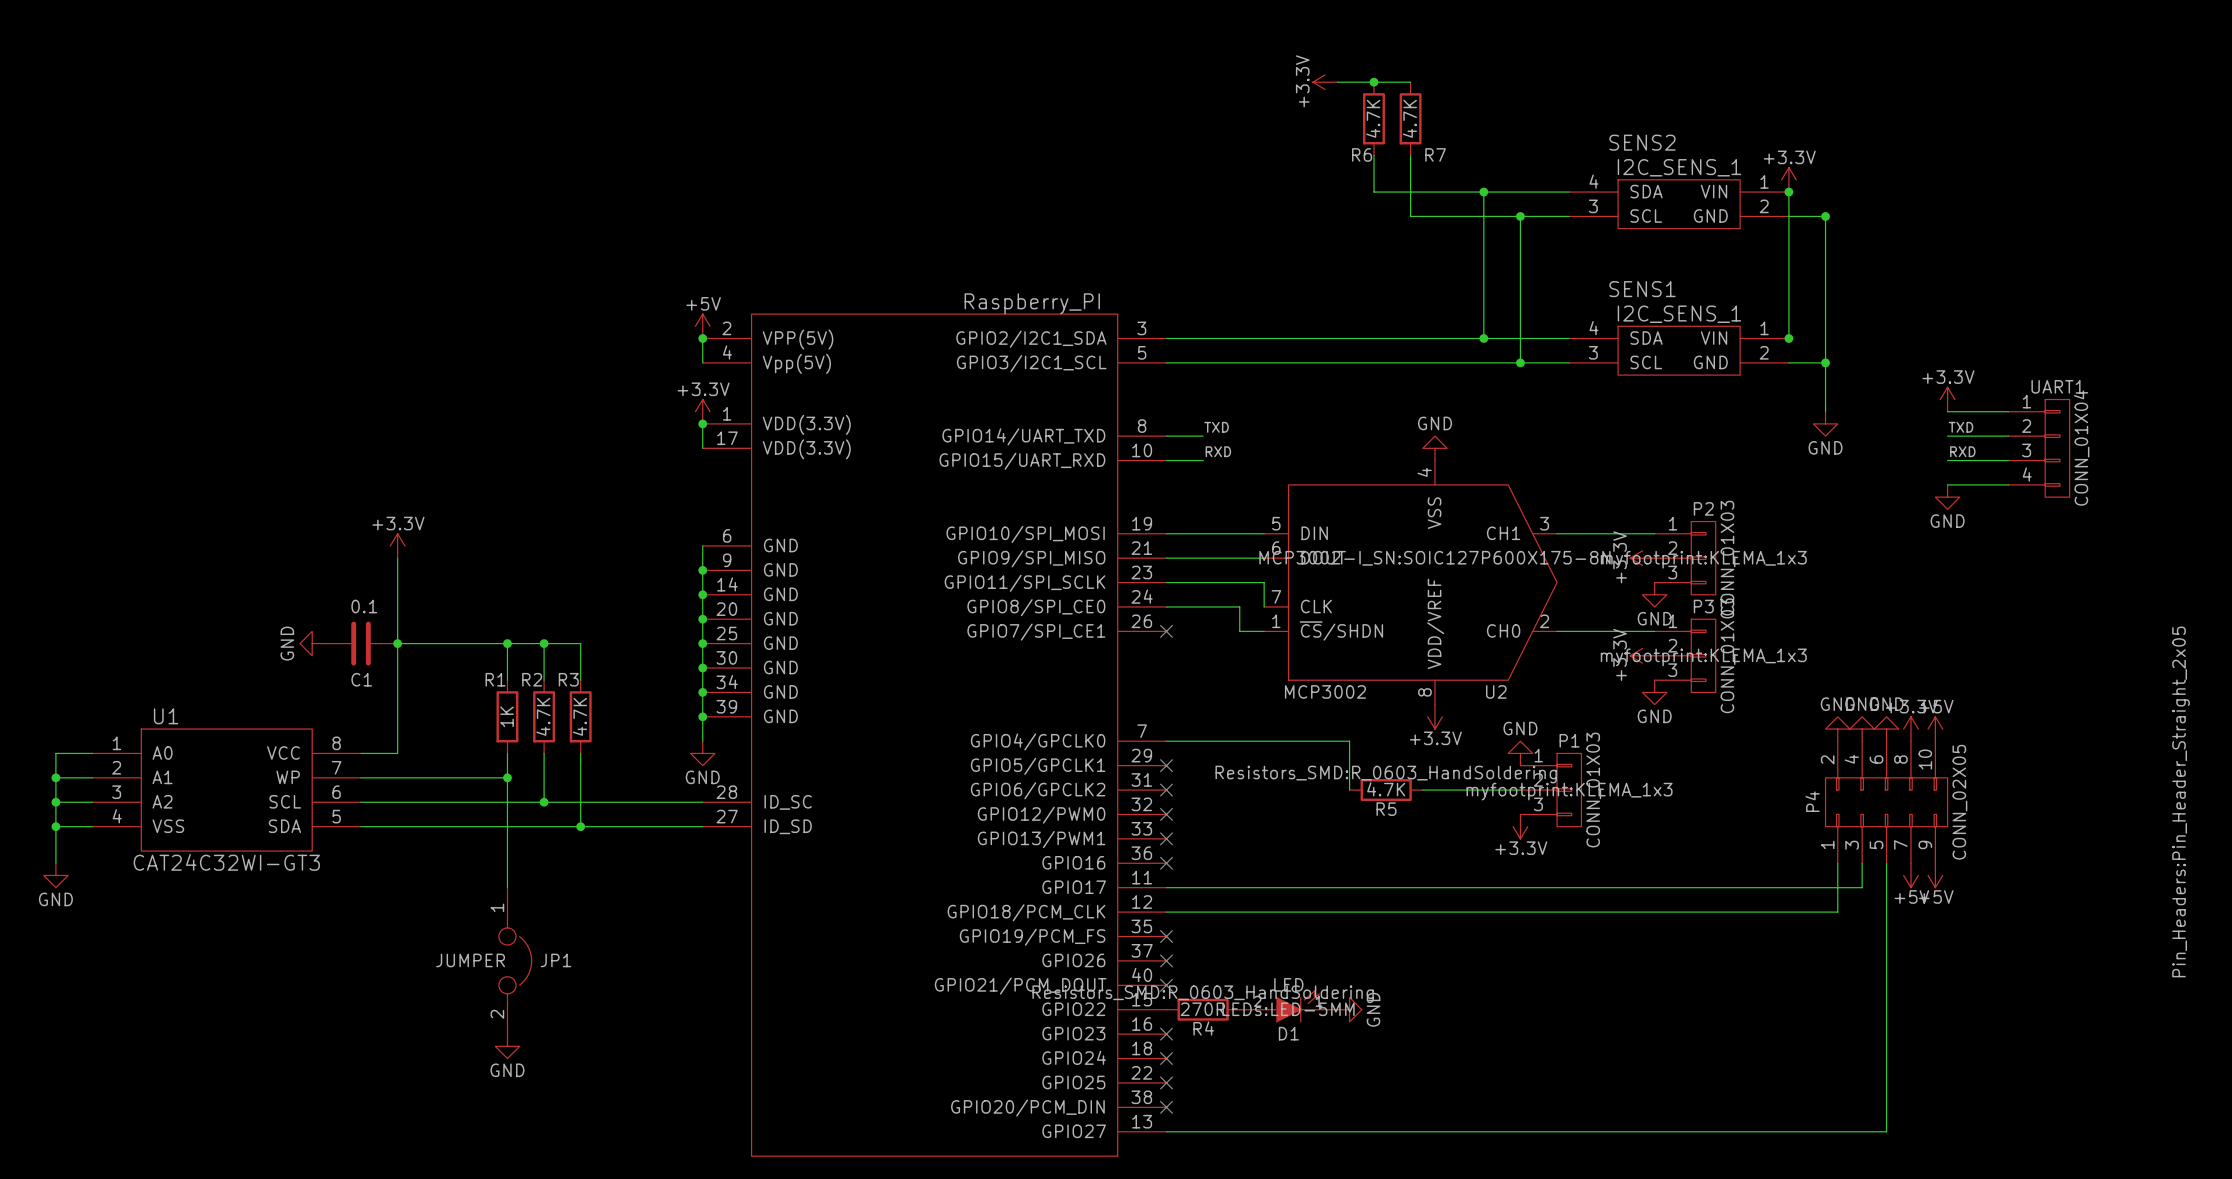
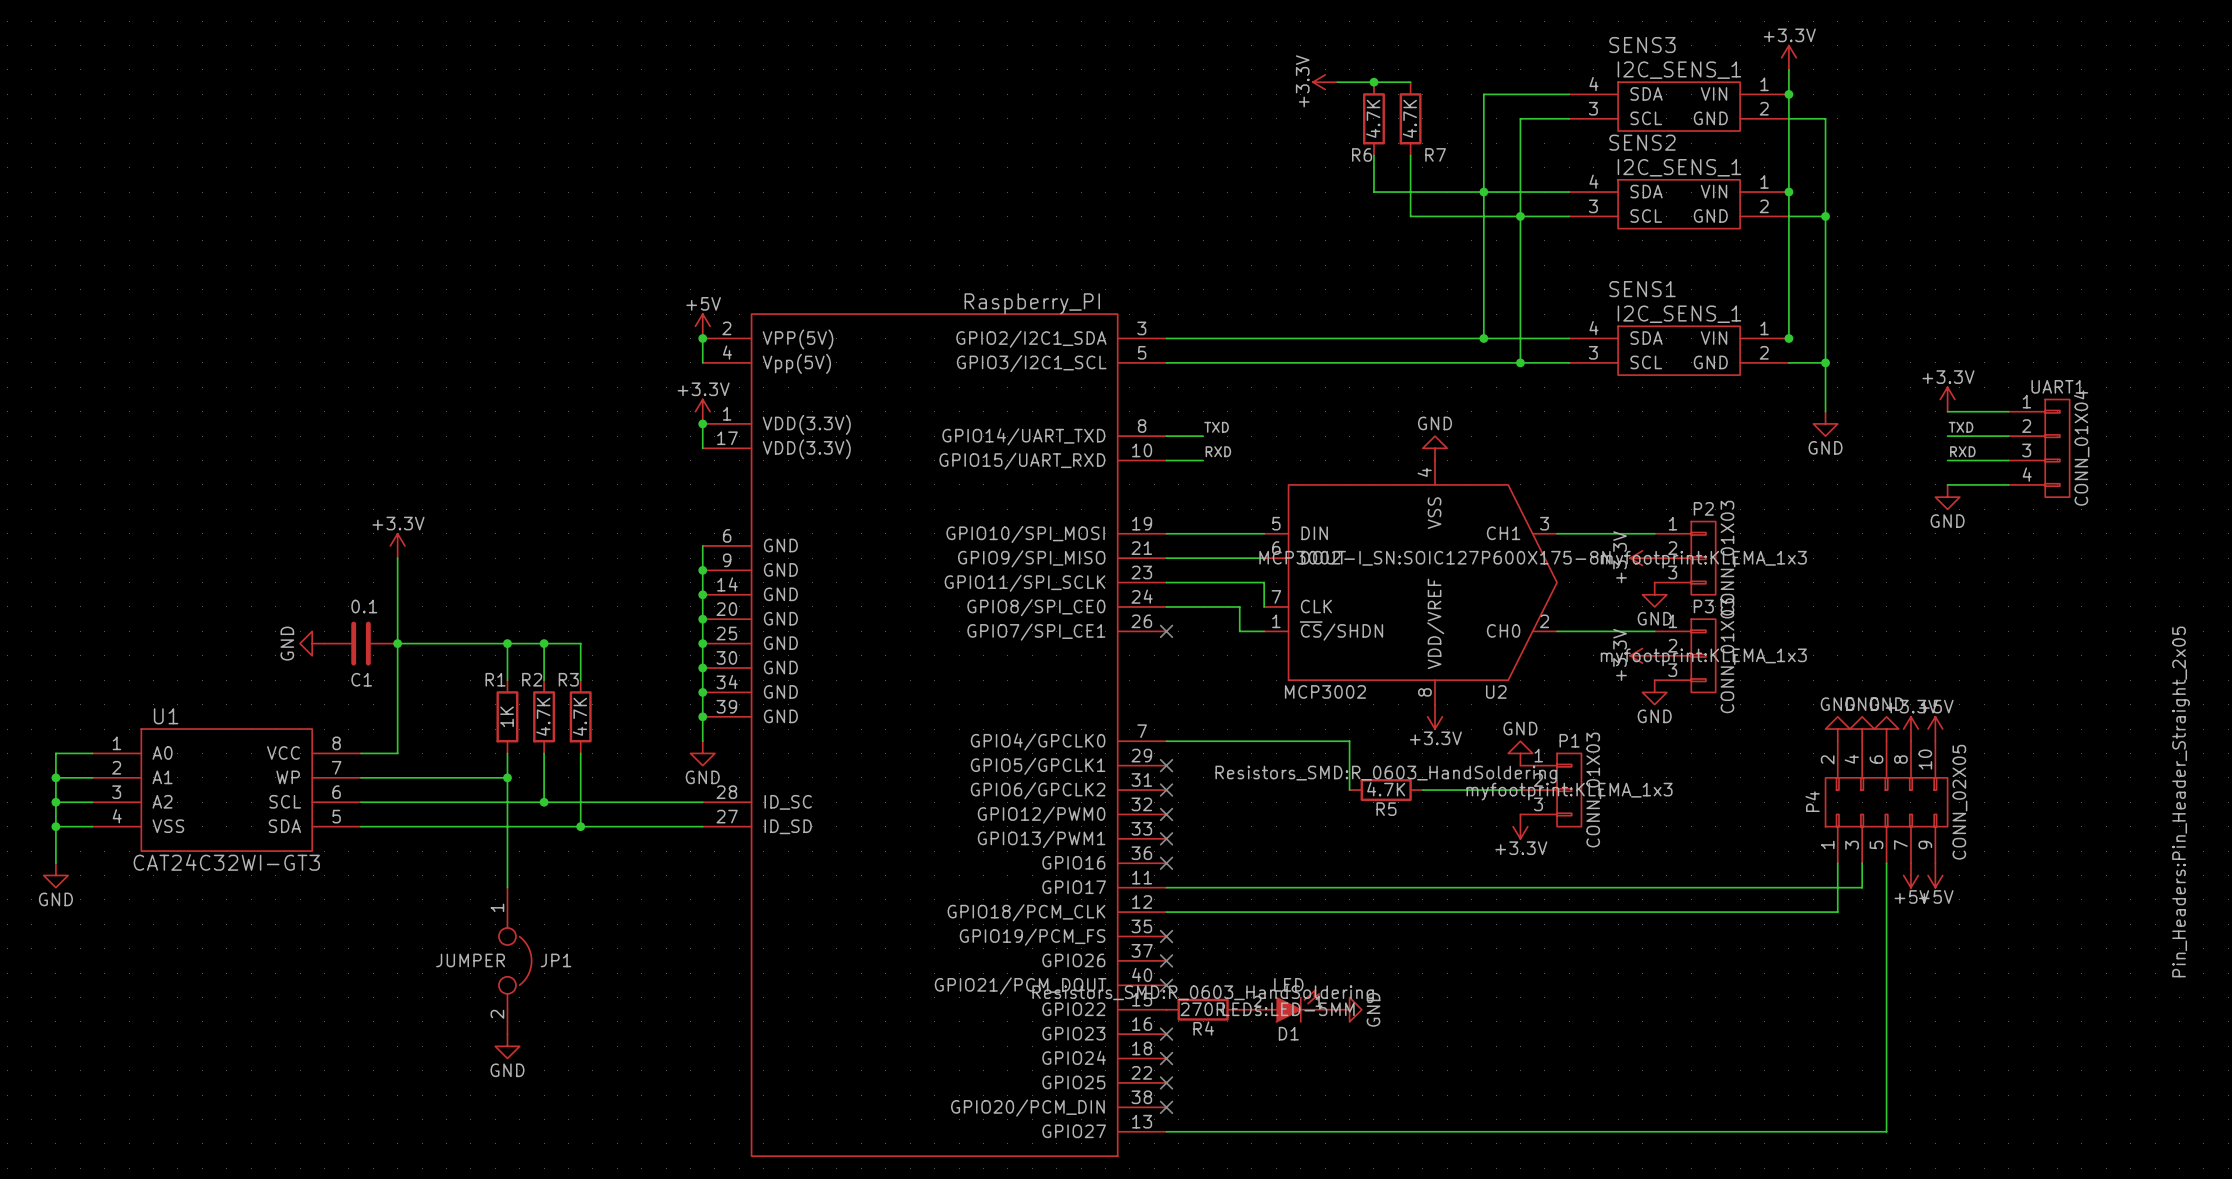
wire: none -> (1788, 69) (1788, 192)
wire: none -> (1569, 94) (1483, 94) (1483, 192)
junction: none -> (1788, 94)
SENS3: none -> I2C_SENS_1 (1679, 106)
wire: none -> (1569, 118) (1520, 118) (1520, 216)
wire: none -> (1788, 118) (1825, 118) (1825, 216)
power symbol position: +3.3V (1788, 179) -> +3.3V (1788, 57)

